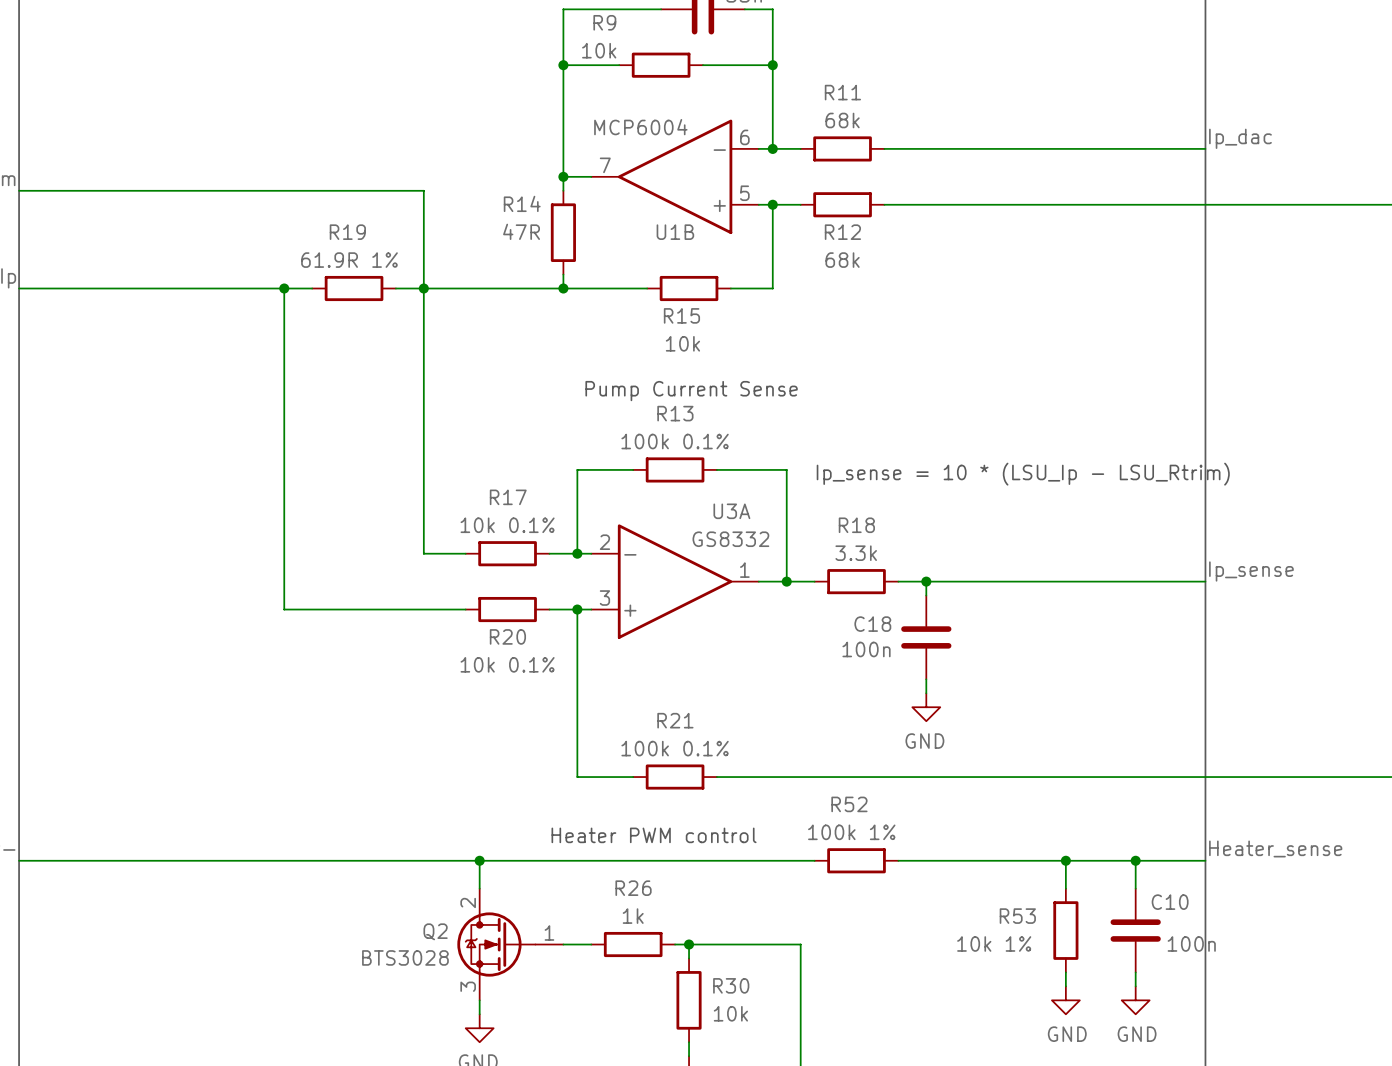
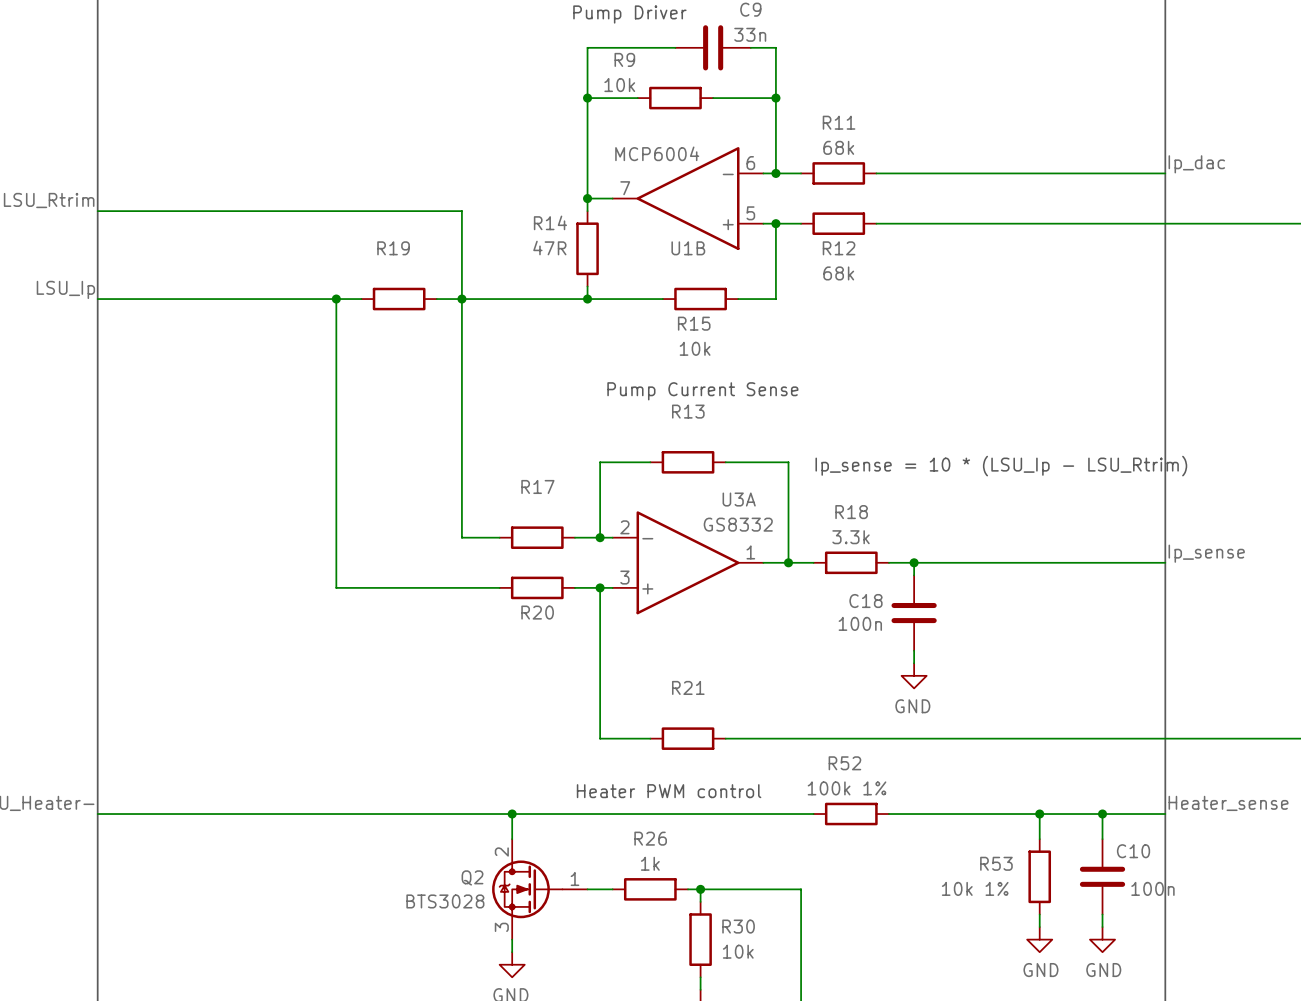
R19 value: 61.9R 1% (349, 260) -> none
R13 value: 100k 0.1% (675, 441) -> none
R17 value: 10k 0.1% (507, 525) -> none
R20 value: 10k 0.1% (507, 664) -> none
R21 value: 100k 0.1% (675, 748) -> none

